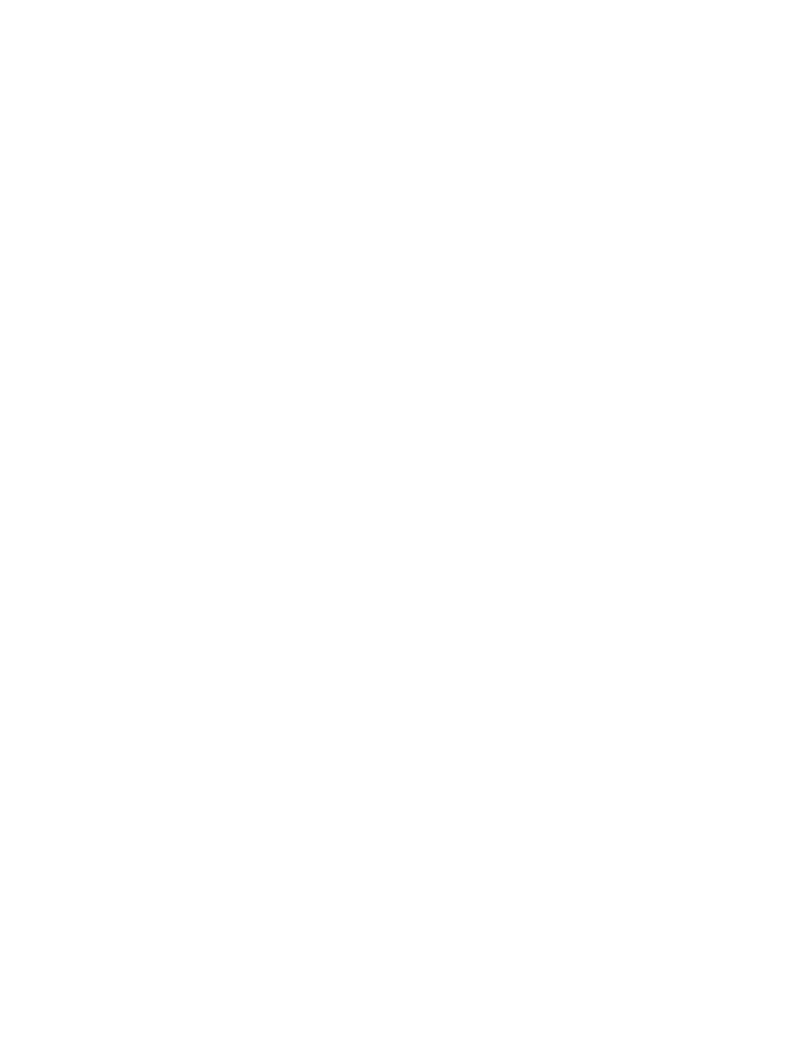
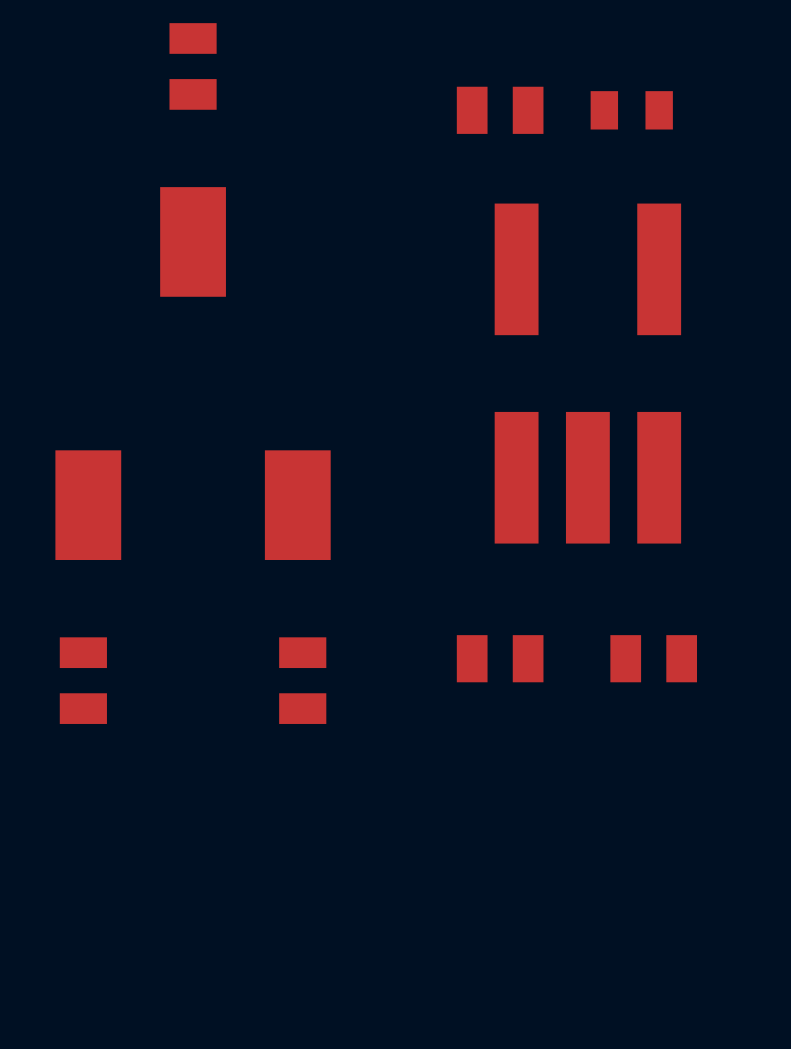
part: none -> (193, 66)
part: none -> (500, 110)
part: none -> (631, 110)
part: none -> (193, 373)
part: none -> (587, 373)
part: none -> (500, 658)
part: none -> (653, 658)
part: none -> (83, 680)
part: none -> (302, 680)

